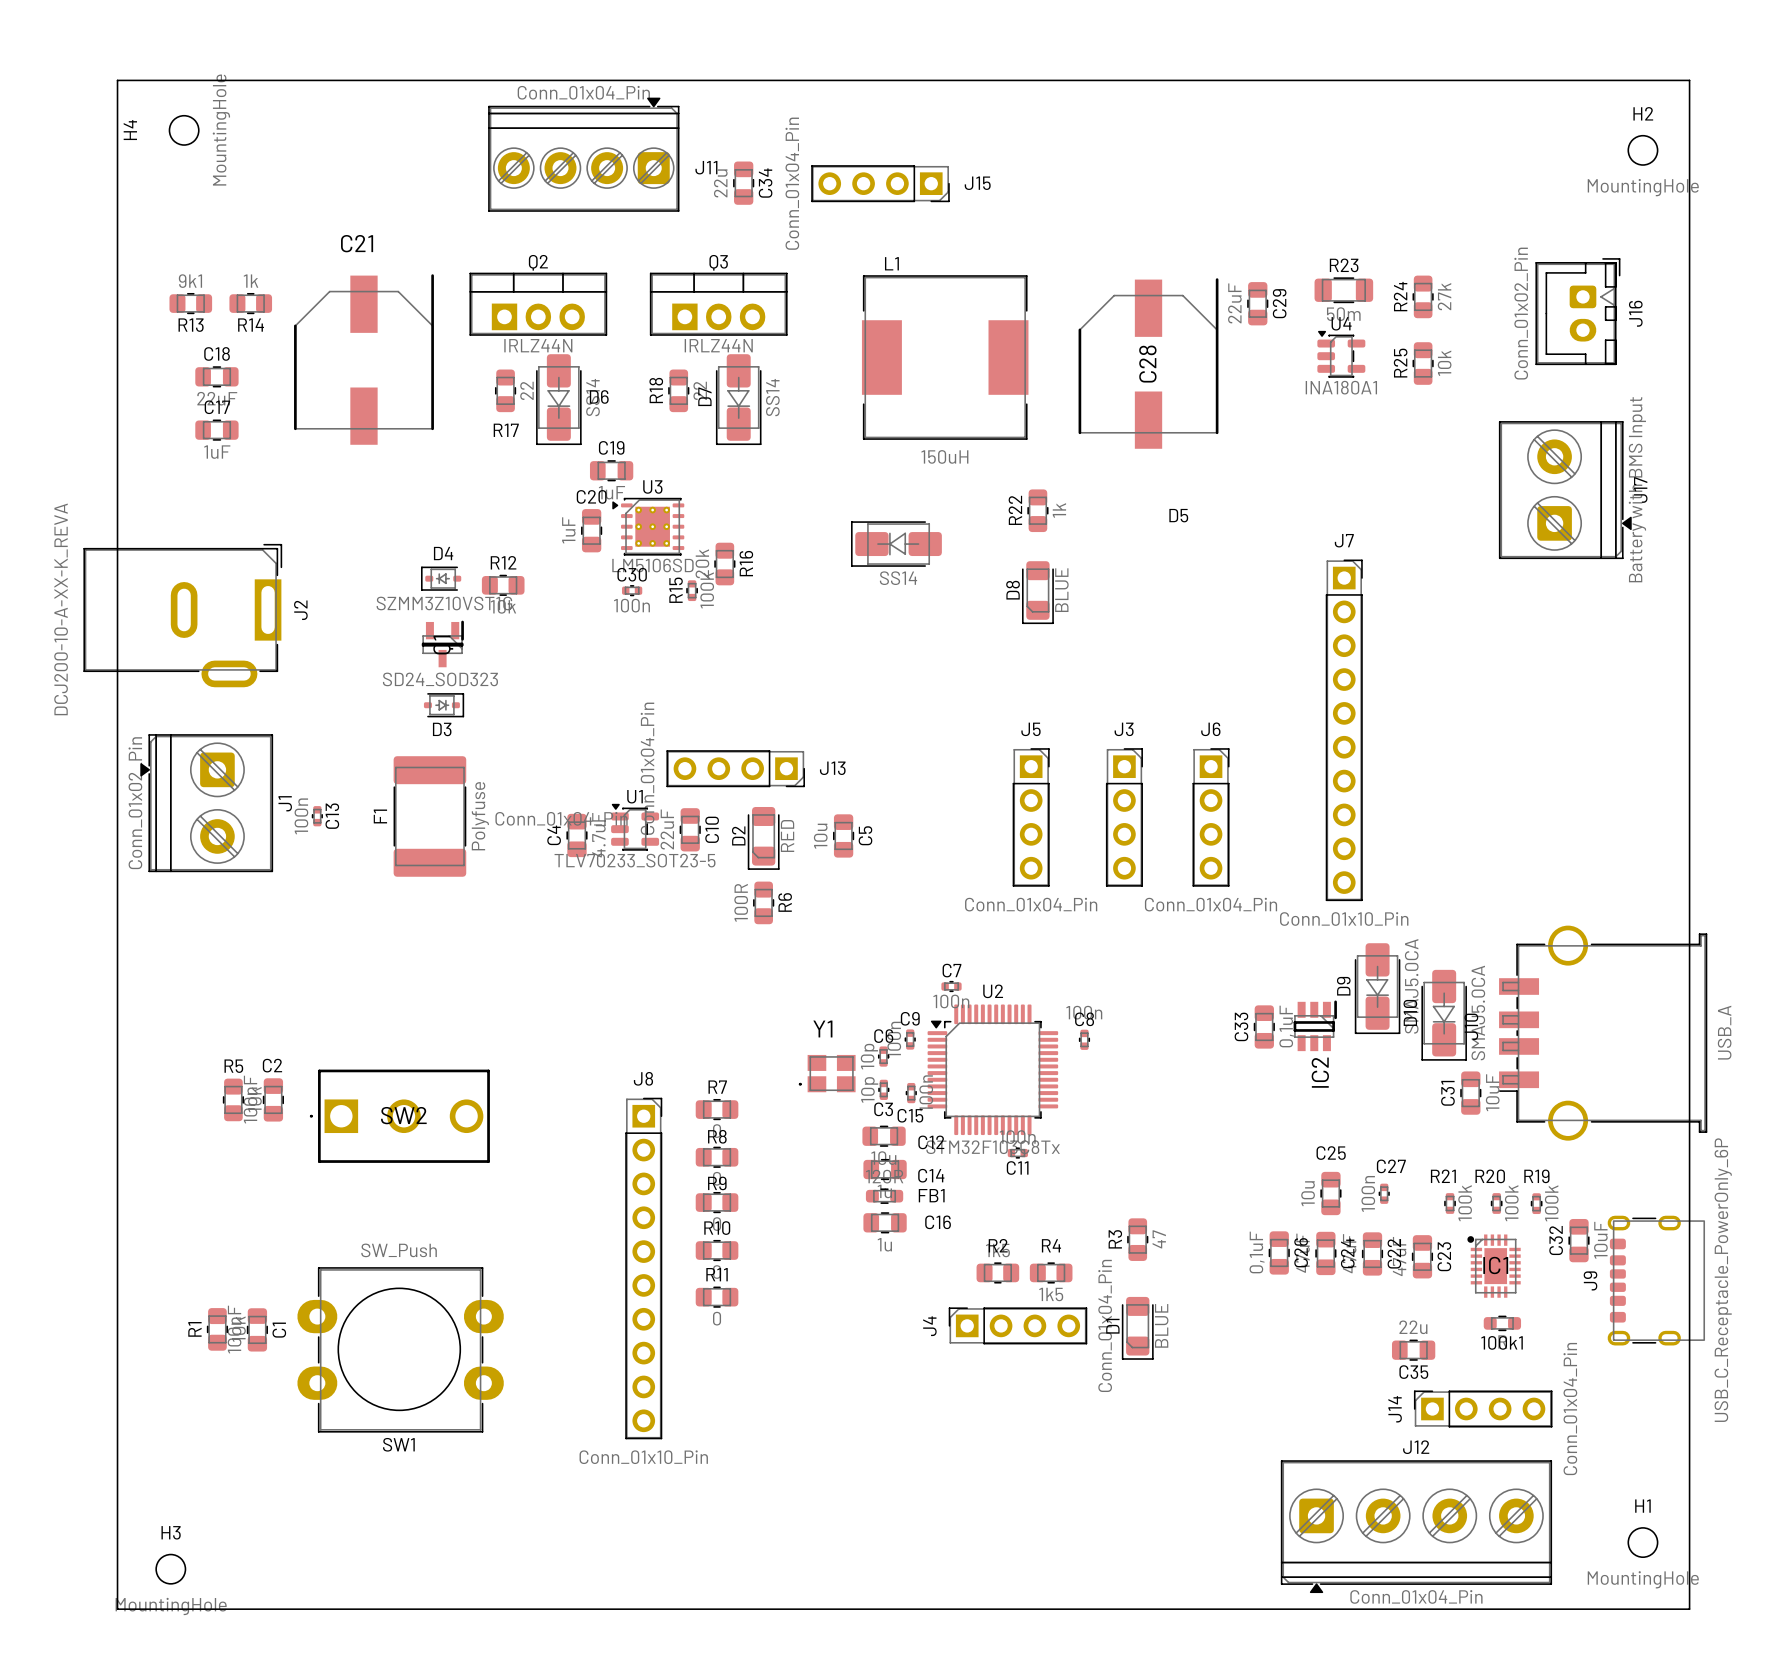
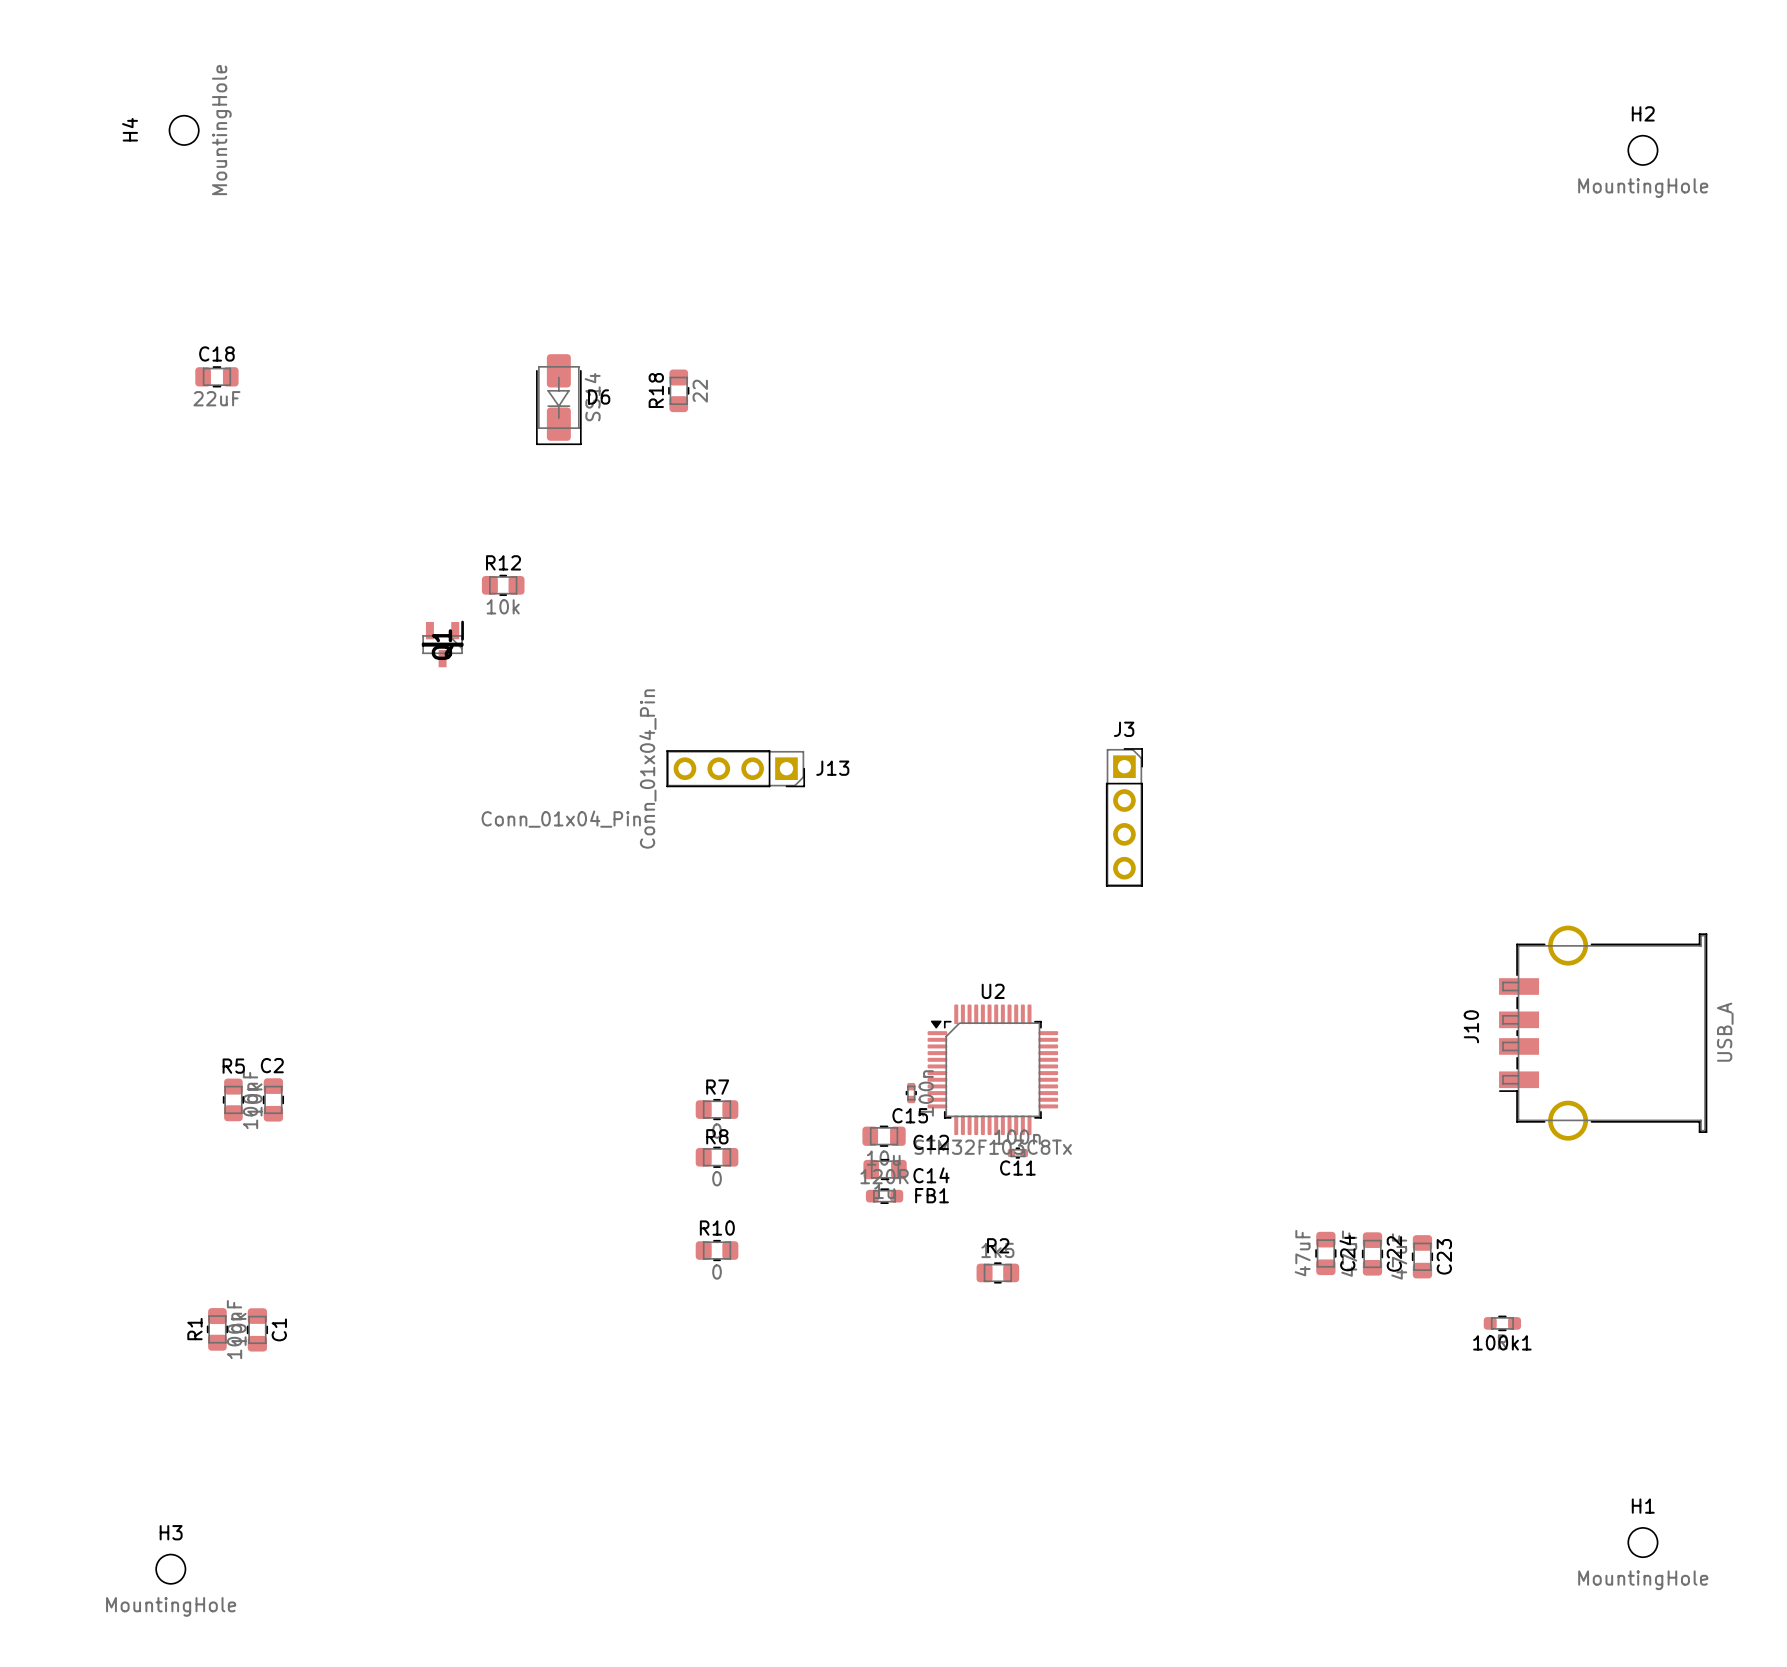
board edge: (117, 80) (1689, 80) (1689, 1609) (117, 1609) (117, 80) -> none
J11: Conn_01x04_Pin (583, 154) -> none
C34: 22u (743, 183) -> none
J15: Conn_01x04_Pin (880, 183) -> none
R23: 50m (1343, 290) -> none
R24: 27k (1423, 296) -> none
R13: 9k1 (190, 303) -> none
R14: 1k (250, 303) -> none
C29: 22uF (1257, 303) -> none
Q2: IRLZ44N (538, 304) -> none
Q3: IRLZ44N (718, 304) -> none
J16: Conn_01x02_Pin (1577, 311) -> none
U4: INA180A1 (1341, 354) -> none
L1: 150uH (945, 357) -> none
C21: (363, 359) -> none
C28: (1148, 363) -> none
R25: 10k (1423, 363) -> none
R17: 22 (505, 390) -> none
D7: SS14 (738, 399) -> none
C17: 1uF (216, 430) -> none
C19: 1uF (611, 470) -> none
J17: Battery with BMS Input (1565, 490) -> none
R22: 1k (1037, 510) -> none
U3: LM5106SD (648, 526) -> none
C20: 1uF (591, 530) -> none
D5: SS14 (896, 544) -> none
R16: 20k (724, 564) -> none
D4: SZMM3Z10VST1G (441, 578) -> none
C30: 100n (632, 590) -> none
R15: 100k (692, 590) -> none
D8: BLUE (1037, 592) -> none
J2: DCJ200-10-A-XX-K_REVA (182, 615) -> none
D3: SD24_SOD323 (444, 705) -> none
J7: Conn_01x10_Pin (1344, 730) -> none
J1: Conn_01x02_Pin (206, 803) -> none
C13: 100n (317, 816) -> none
F1: Polyfuse (429, 816) -> none
J5: Conn_01x04_Pin (1031, 817) -> none
J6: Conn_01x04_Pin (1211, 817) -> none
U1: TLV70233_SOT23-5 (635, 827) -> none
C10: 22uF (690, 829) -> none
C4: 4.7uF (576, 835) -> none
C5: 10u (843, 835) -> none
D2: RED (763, 838) -> none
R6: 100R (763, 902) -> none
C7: 100n (951, 986) -> none
D9: SMAJ5.0CA (1377, 988) -> none
D10: SMAJ5.0CA (1444, 1015) -> none
IC2: (1315, 1025) -> none
C33: 0,1uF (1264, 1026) -> none
C9: 100n (910, 1039) -> none
C8: 100n (1084, 1039) -> none
C6: 10p (883, 1056) -> none
Y1: (827, 1073) -> none
C3: 10p (883, 1089) -> none
C31: 10uF (1470, 1093) -> none
SW2: (399, 1116) -> none
C25: 10u (1330, 1193) -> none
C27: 100n (1384, 1193) -> none
R9: 0 (717, 1202) -> none
R21: 100k (1450, 1203) -> none
R20: 100k (1496, 1203) -> none
R19: 100k (1536, 1203) -> none
C16: 1u (885, 1222) -> none
R3: 47 (1137, 1239) -> none
C32: 10uF (1578, 1240) -> none
C26: 0,1uF (1279, 1252) -> none
IC1: (1494, 1266) -> none
J8: Conn_01x10_Pin (643, 1268) -> none
R4: 1k5 (1051, 1272) -> none
J9: USB_C_Receptacle_PowerOnly_6P (1656, 1280) -> none
R11: 0 (717, 1297) -> none
J4: Conn_01x04_Pin (1017, 1325) -> none
D1: BLUE (1137, 1328) -> none
SW1: SW_Push (400, 1349) -> none
C35: 22u (1413, 1350) -> none
J14: Conn_01x04_Pin (1483, 1409) -> none
J12: Conn_01x04_Pin (1416, 1526) -> none

